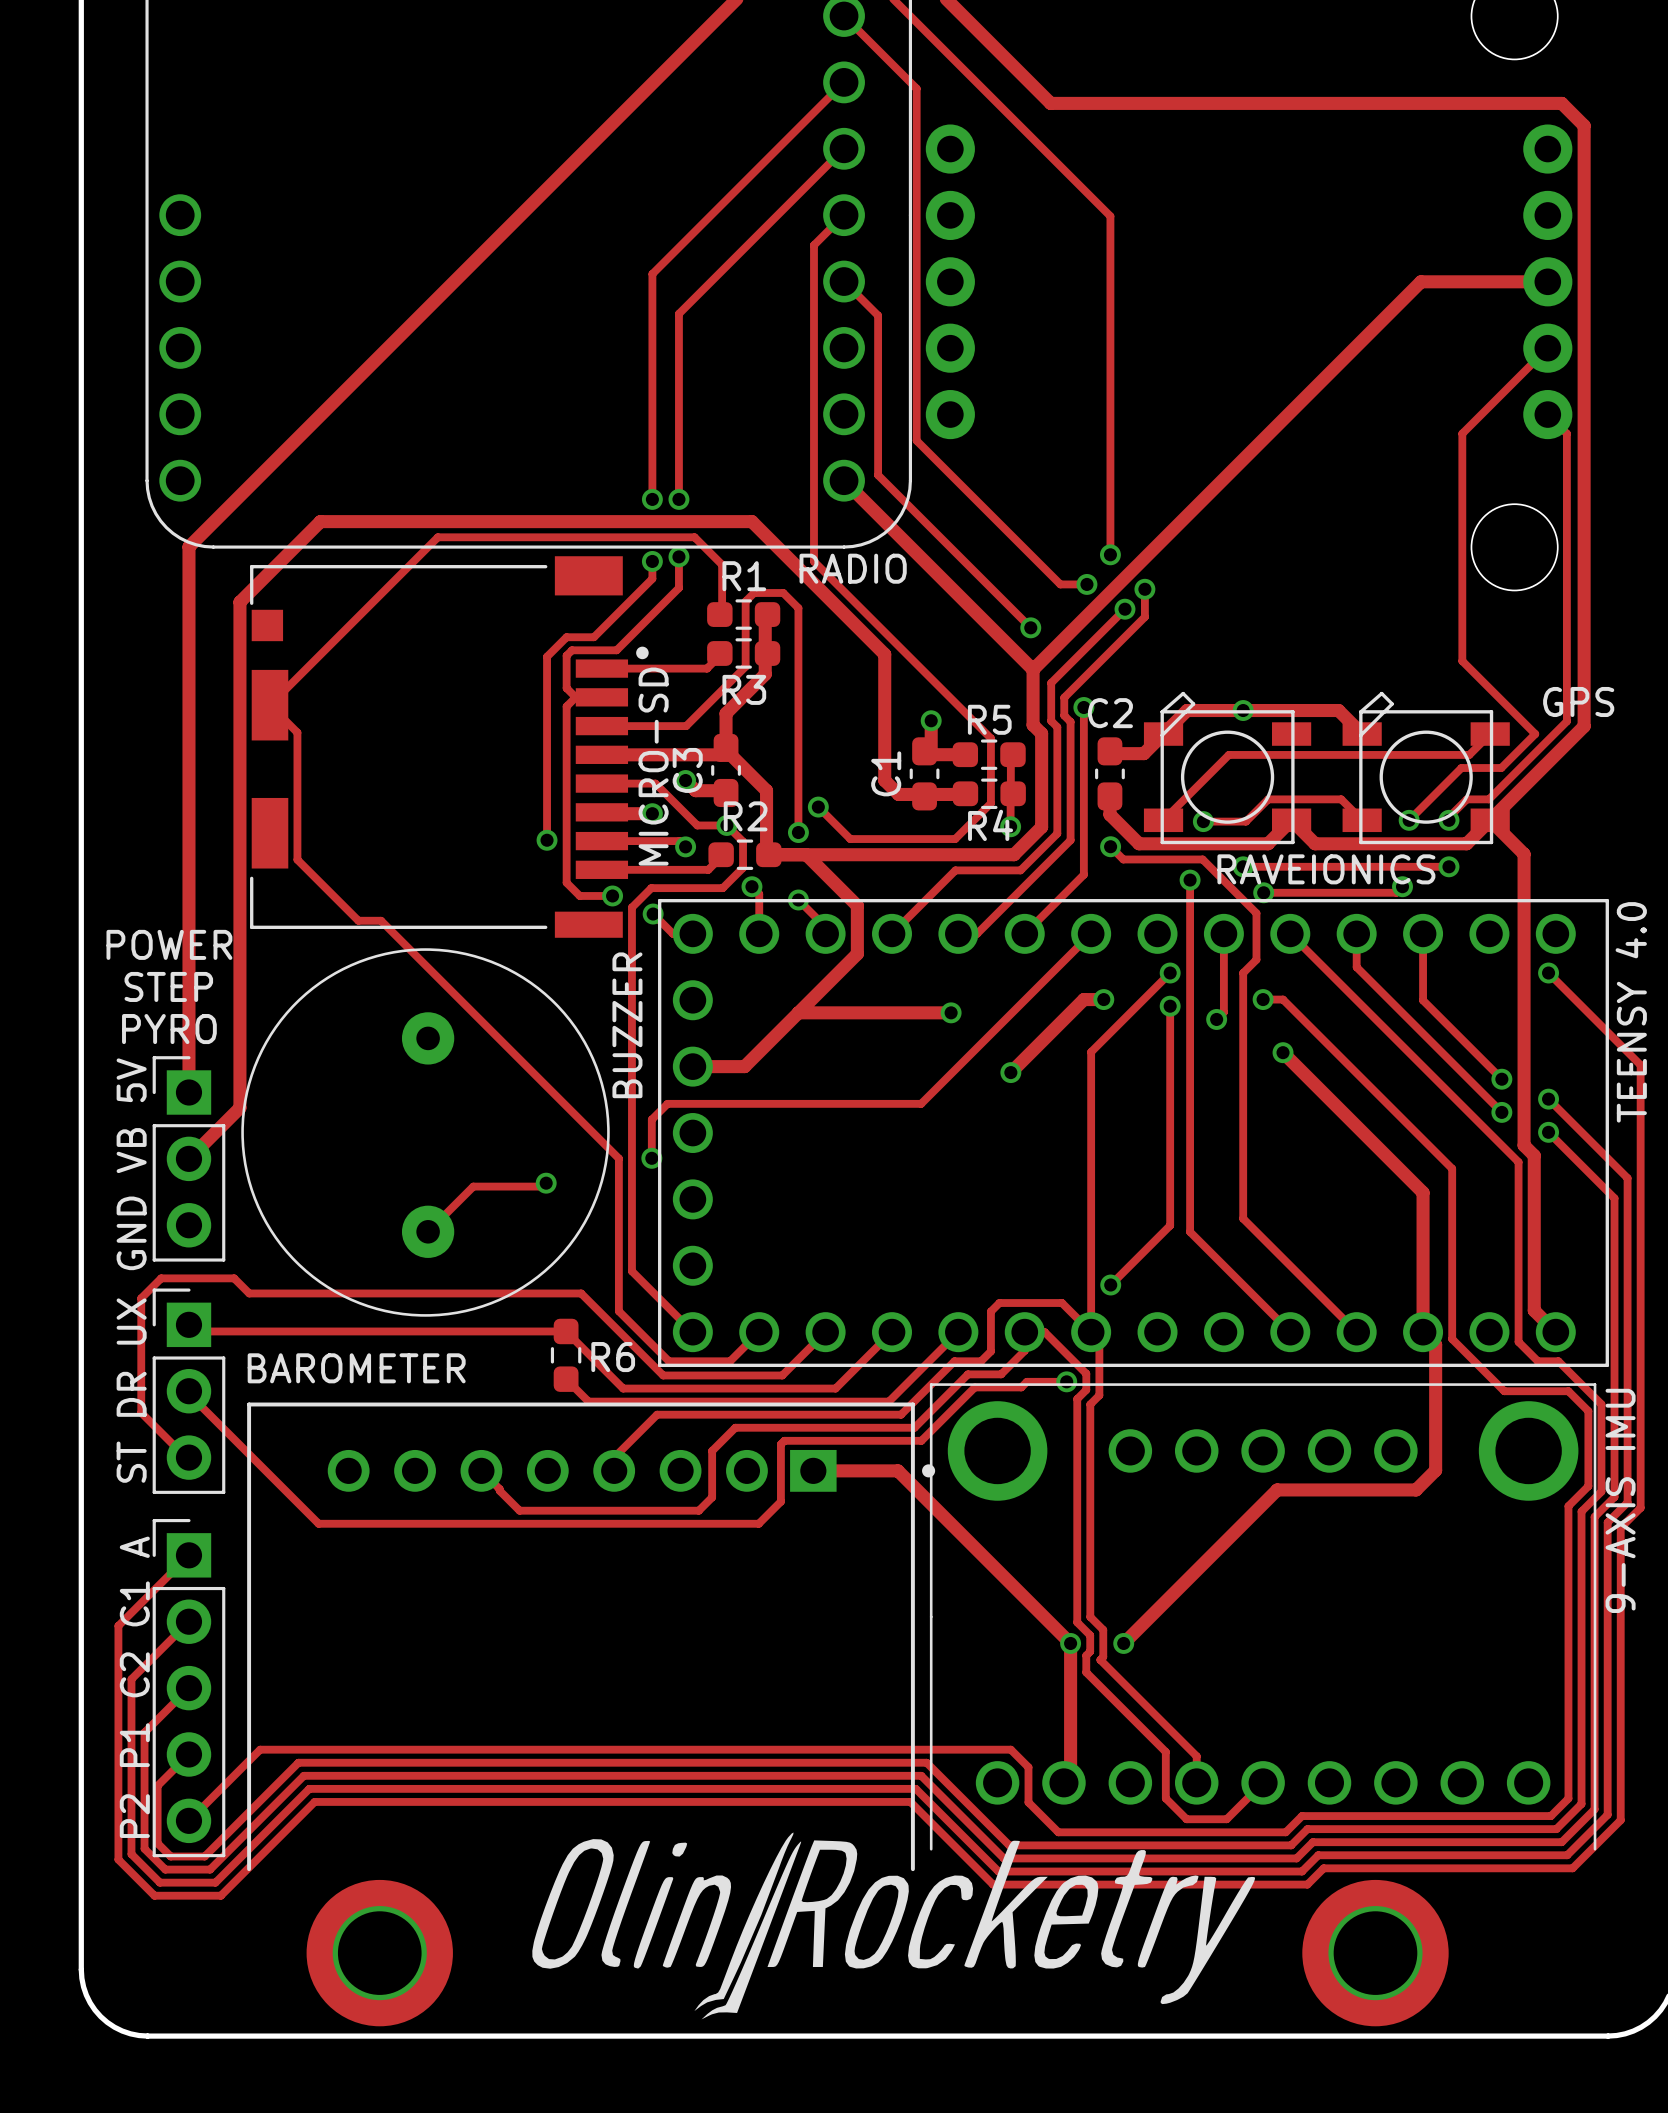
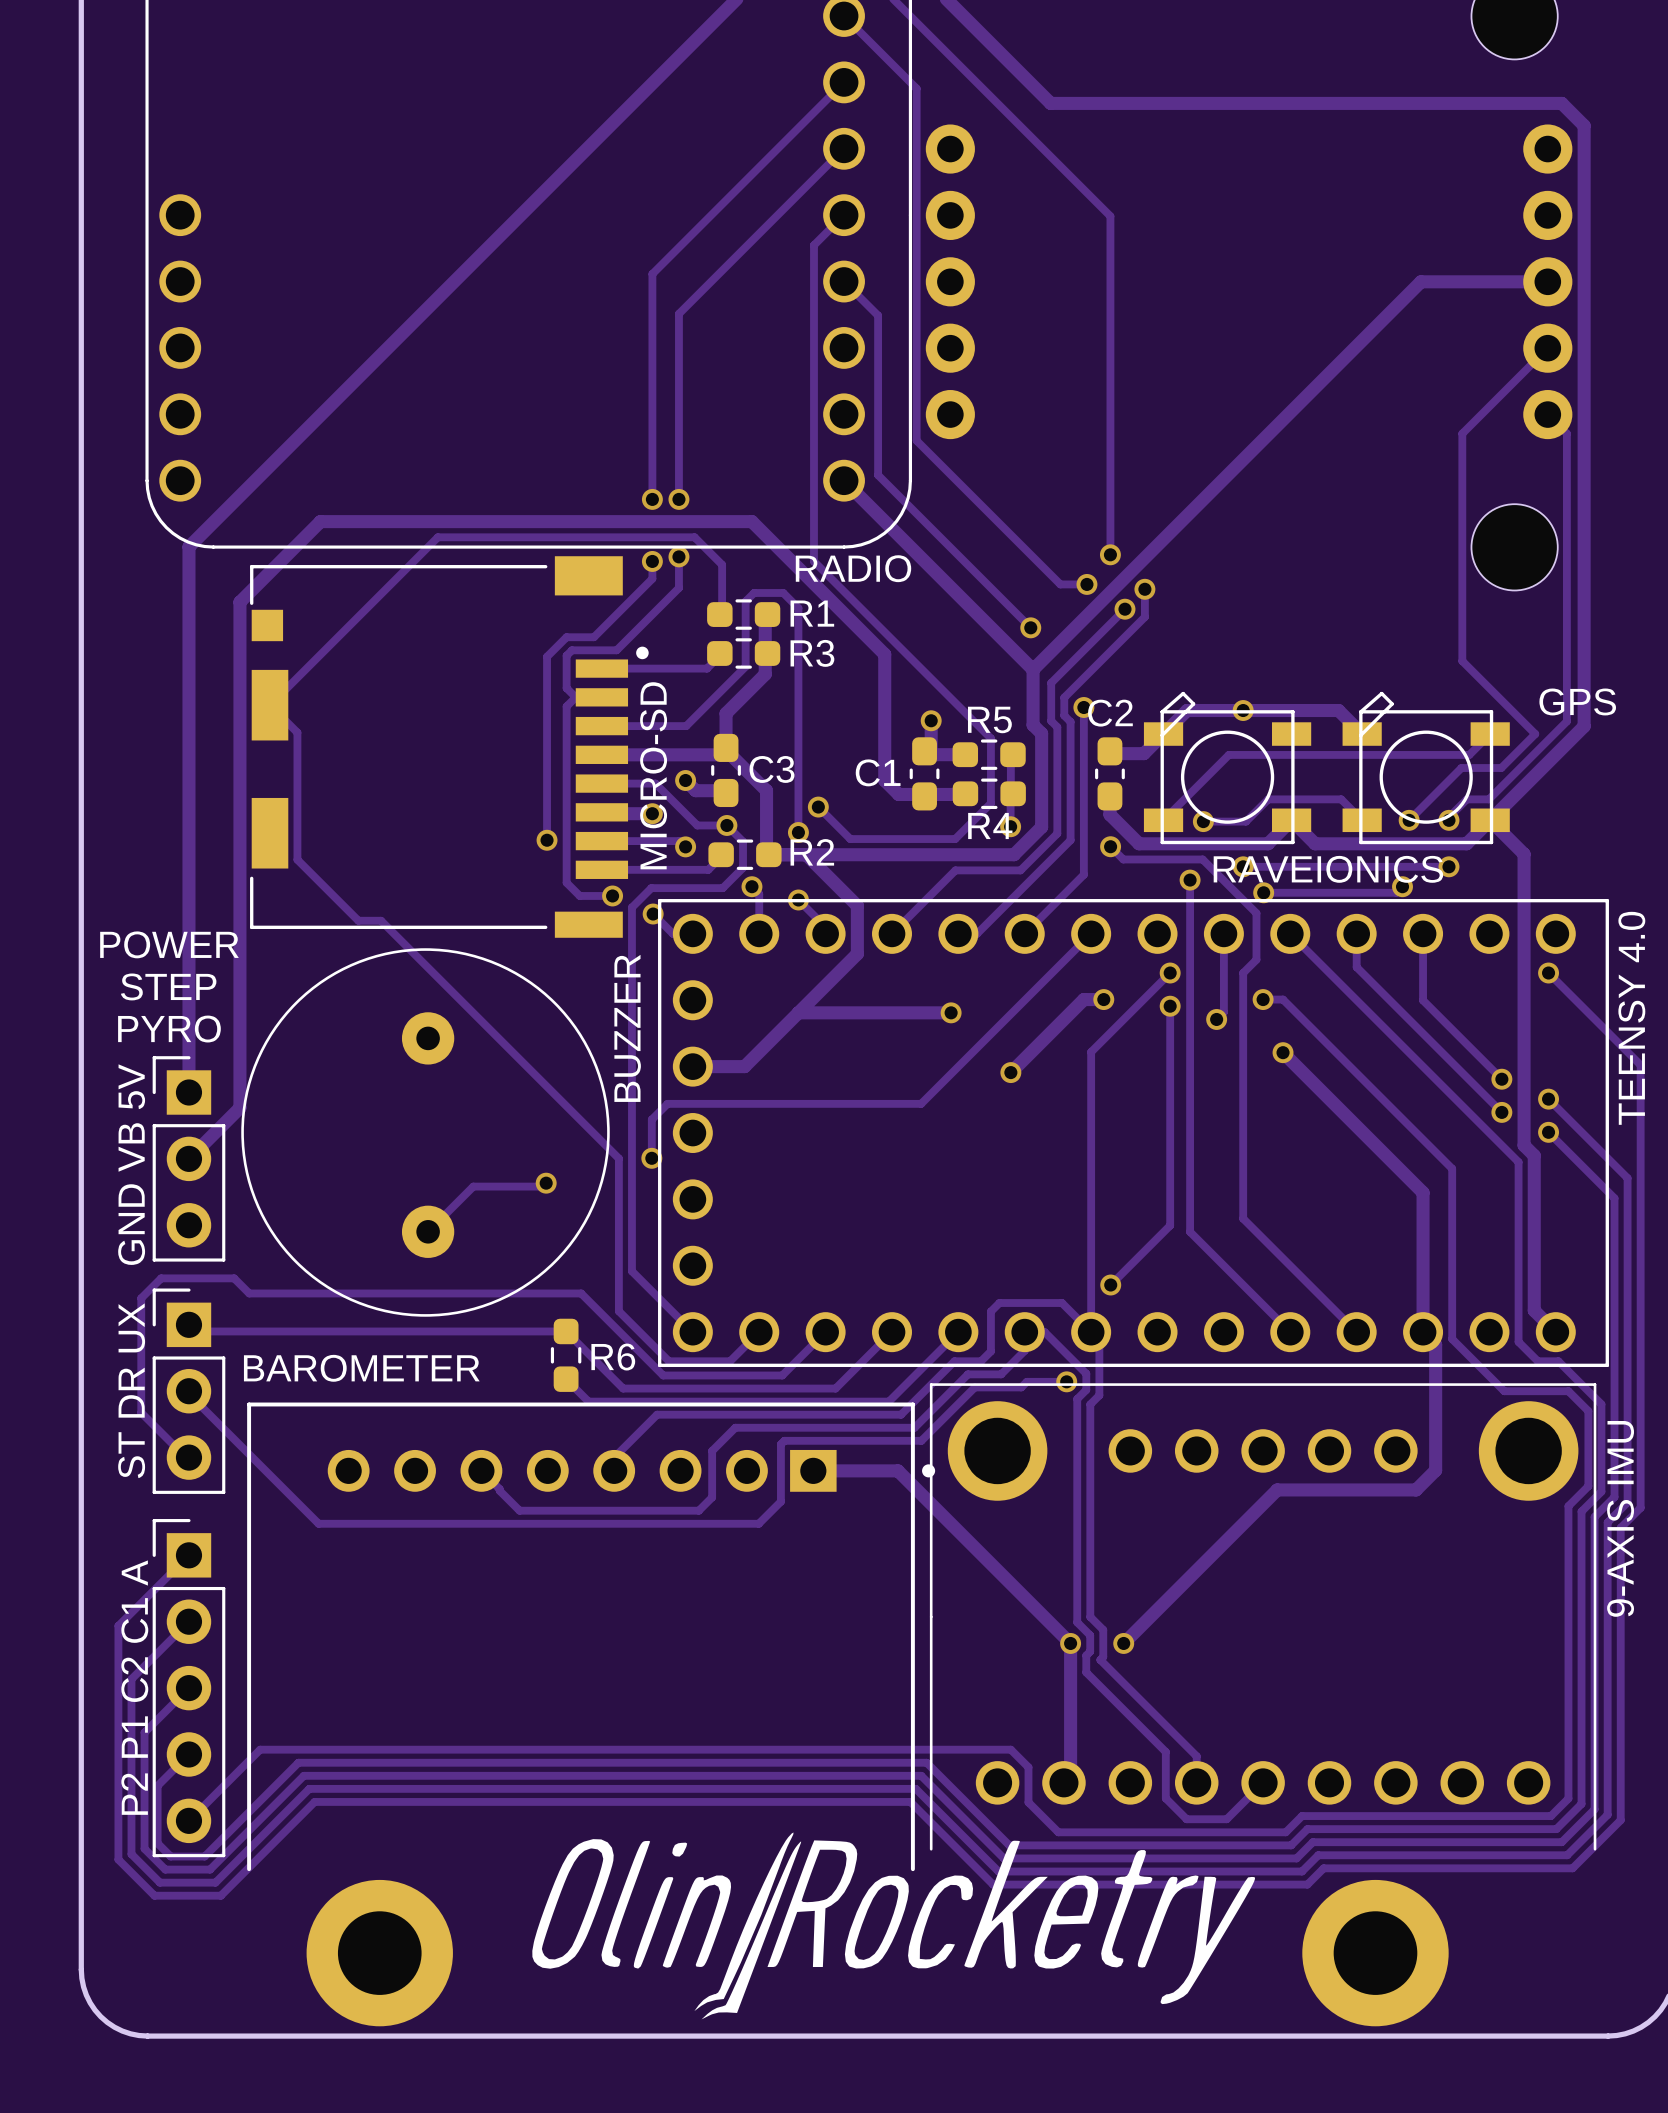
R1 name position: R1 (744, 576) -> R1 (812, 613)
R3 name position: R3 (744, 689) -> R3 (812, 653)
C3 name rotation: 0° (687, 770) -> 90° clockwise (772, 769)
C3 name position: C3 (687, 770) -> C3 (772, 769)
C1 name rotation: 0° (886, 773) -> 90° clockwise (878, 772)
R2 name position: R2 (745, 816) -> R2 (812, 852)

